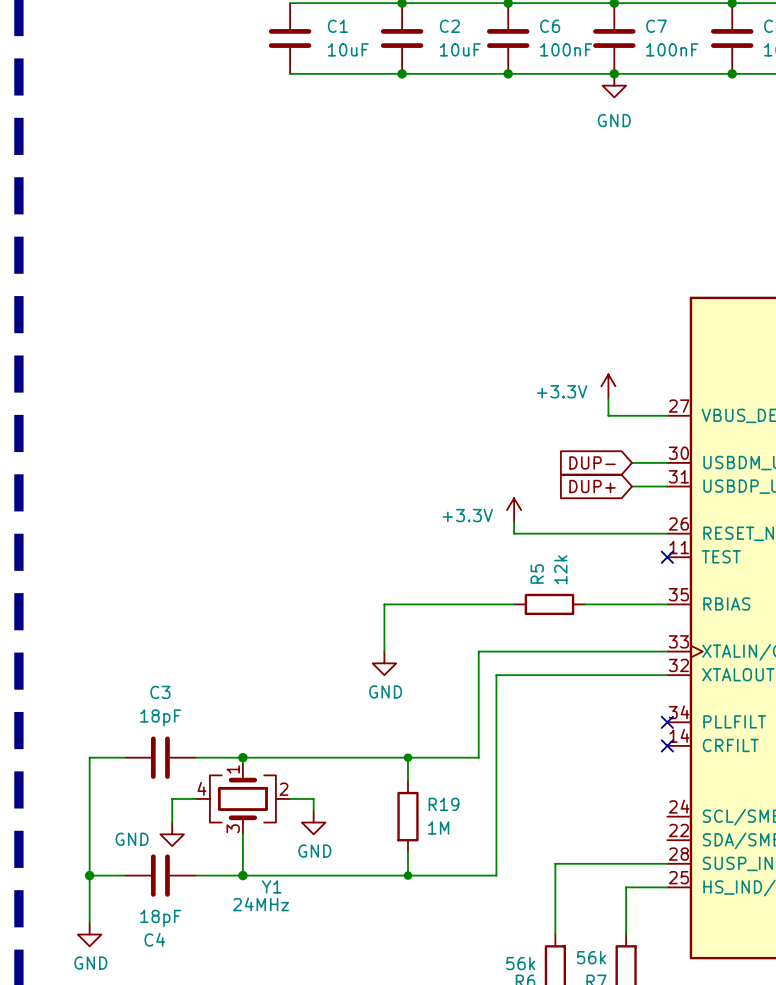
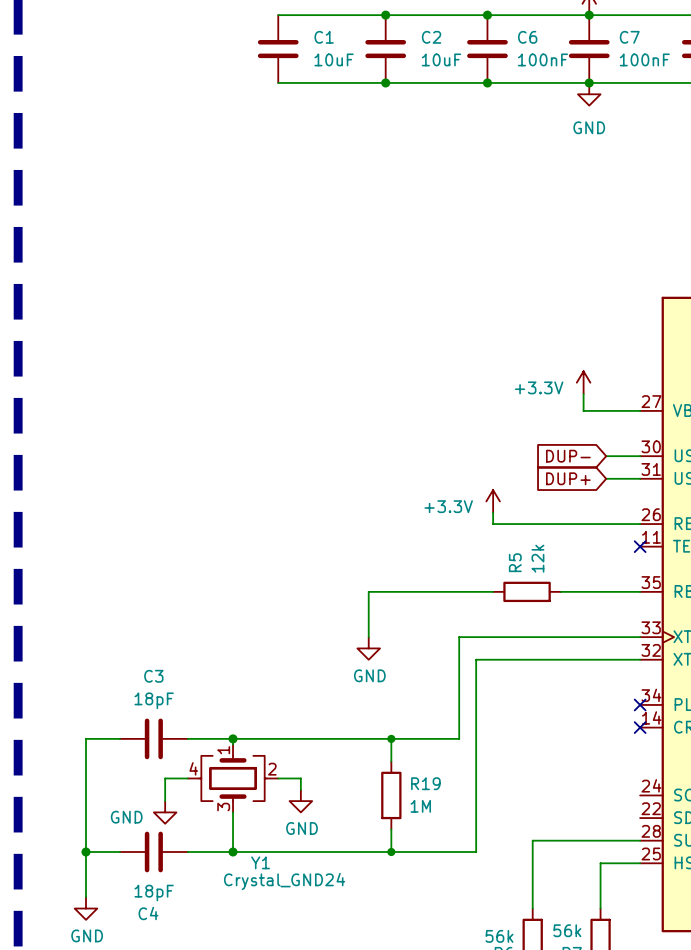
Y1 value: 24MHz (260, 904) -> Crystal_GND24 (284, 881)

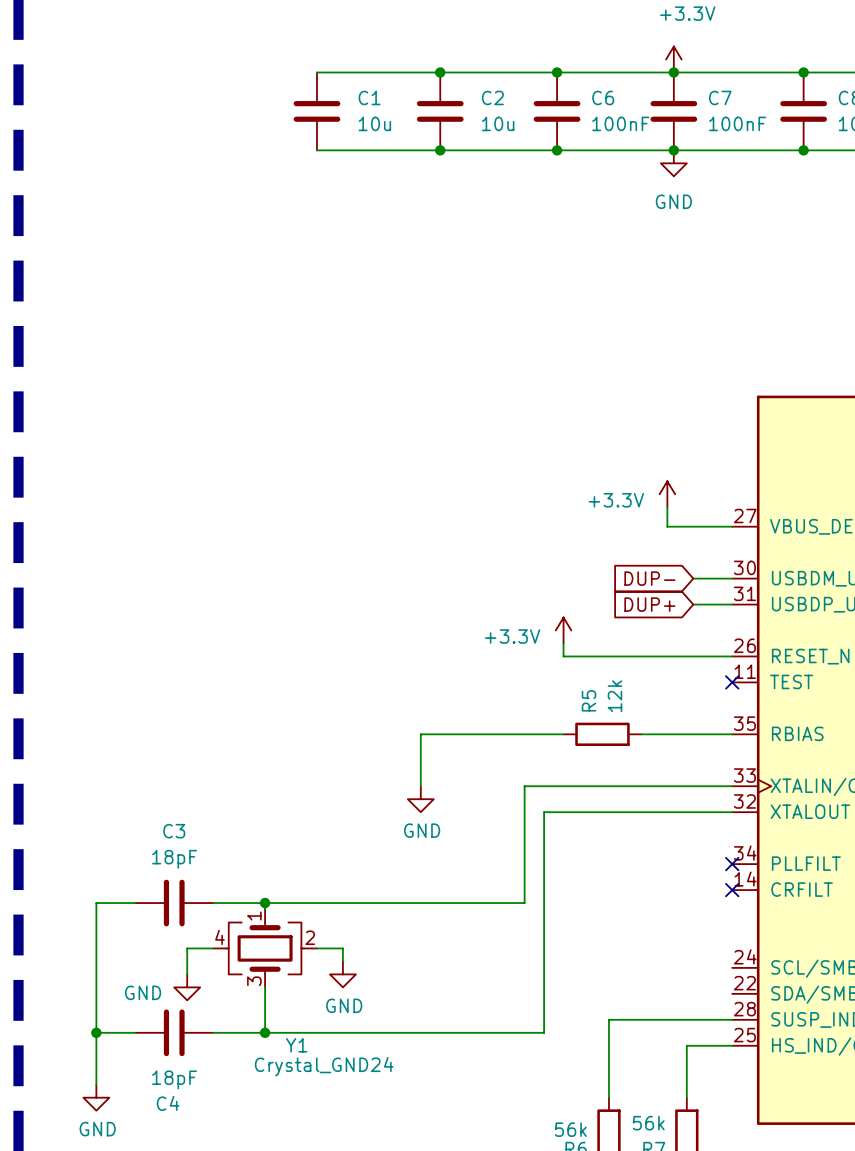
C1 value: 10uF (334, 59) -> 10u (374, 123)
C2 value: 10uF (441, 59) -> 10u (498, 123)
wire: (391, 738) (391, 761) -> none
junction: (391, 738) -> none
R19: 1M (391, 795) -> none
wire: (391, 829) (391, 851) -> none
junction: (391, 851) -> none

